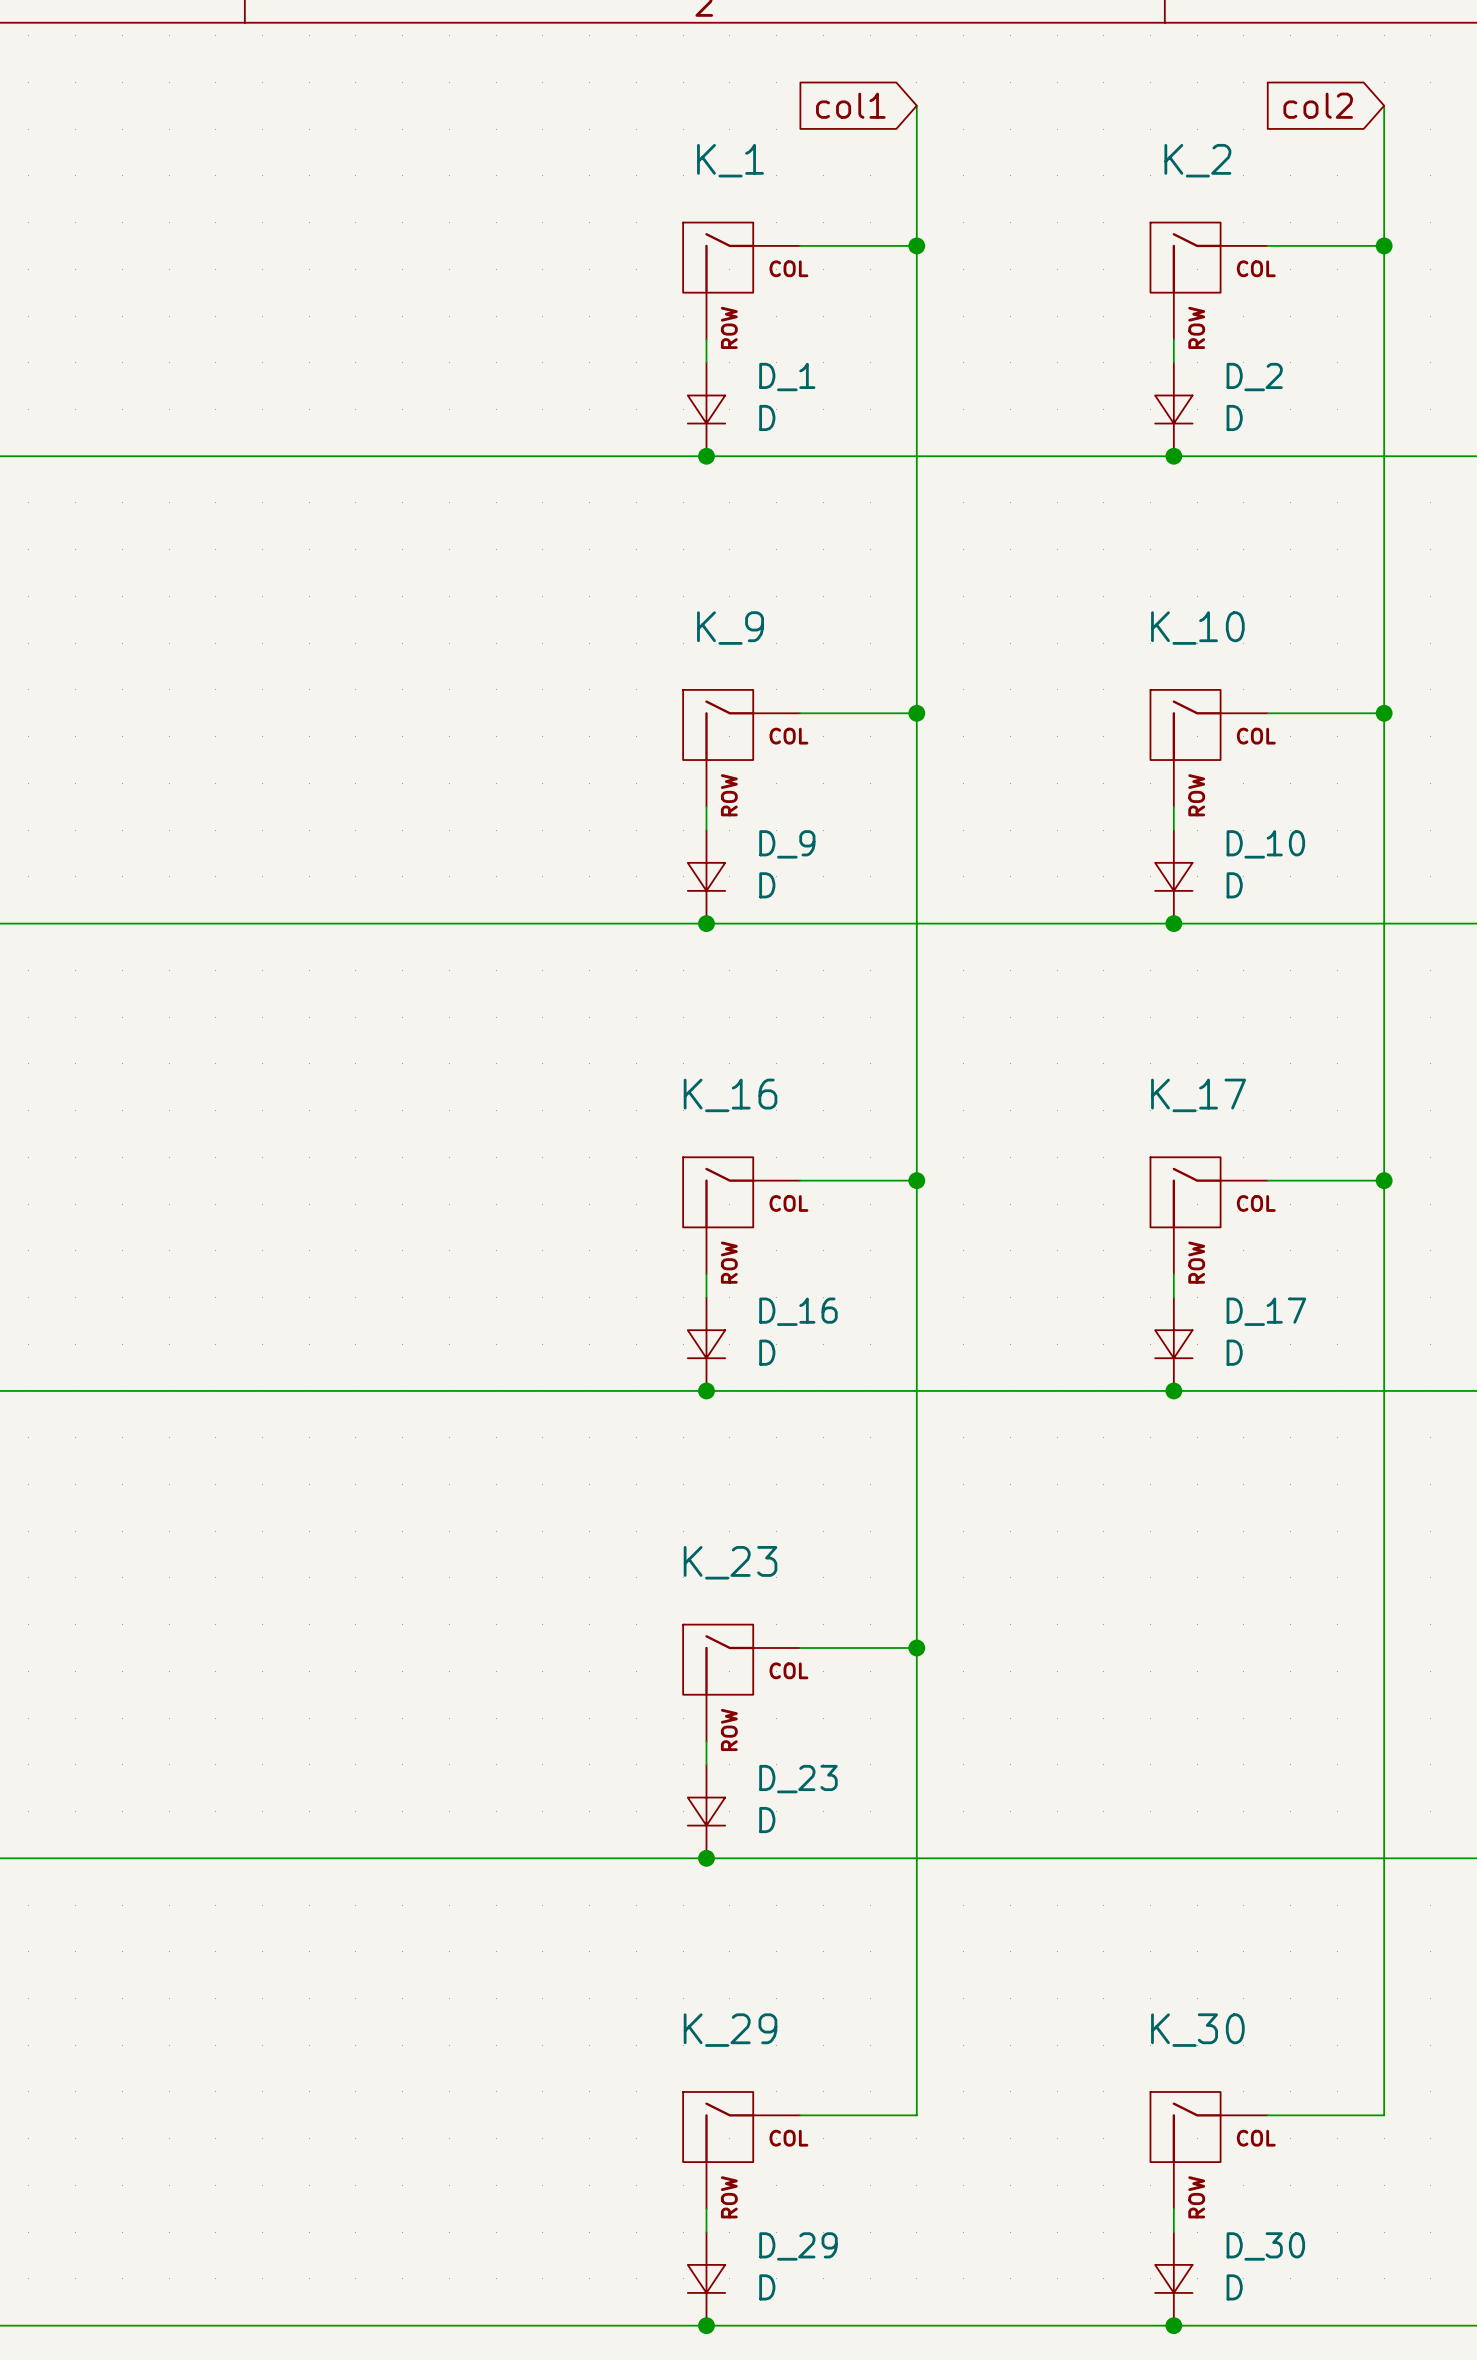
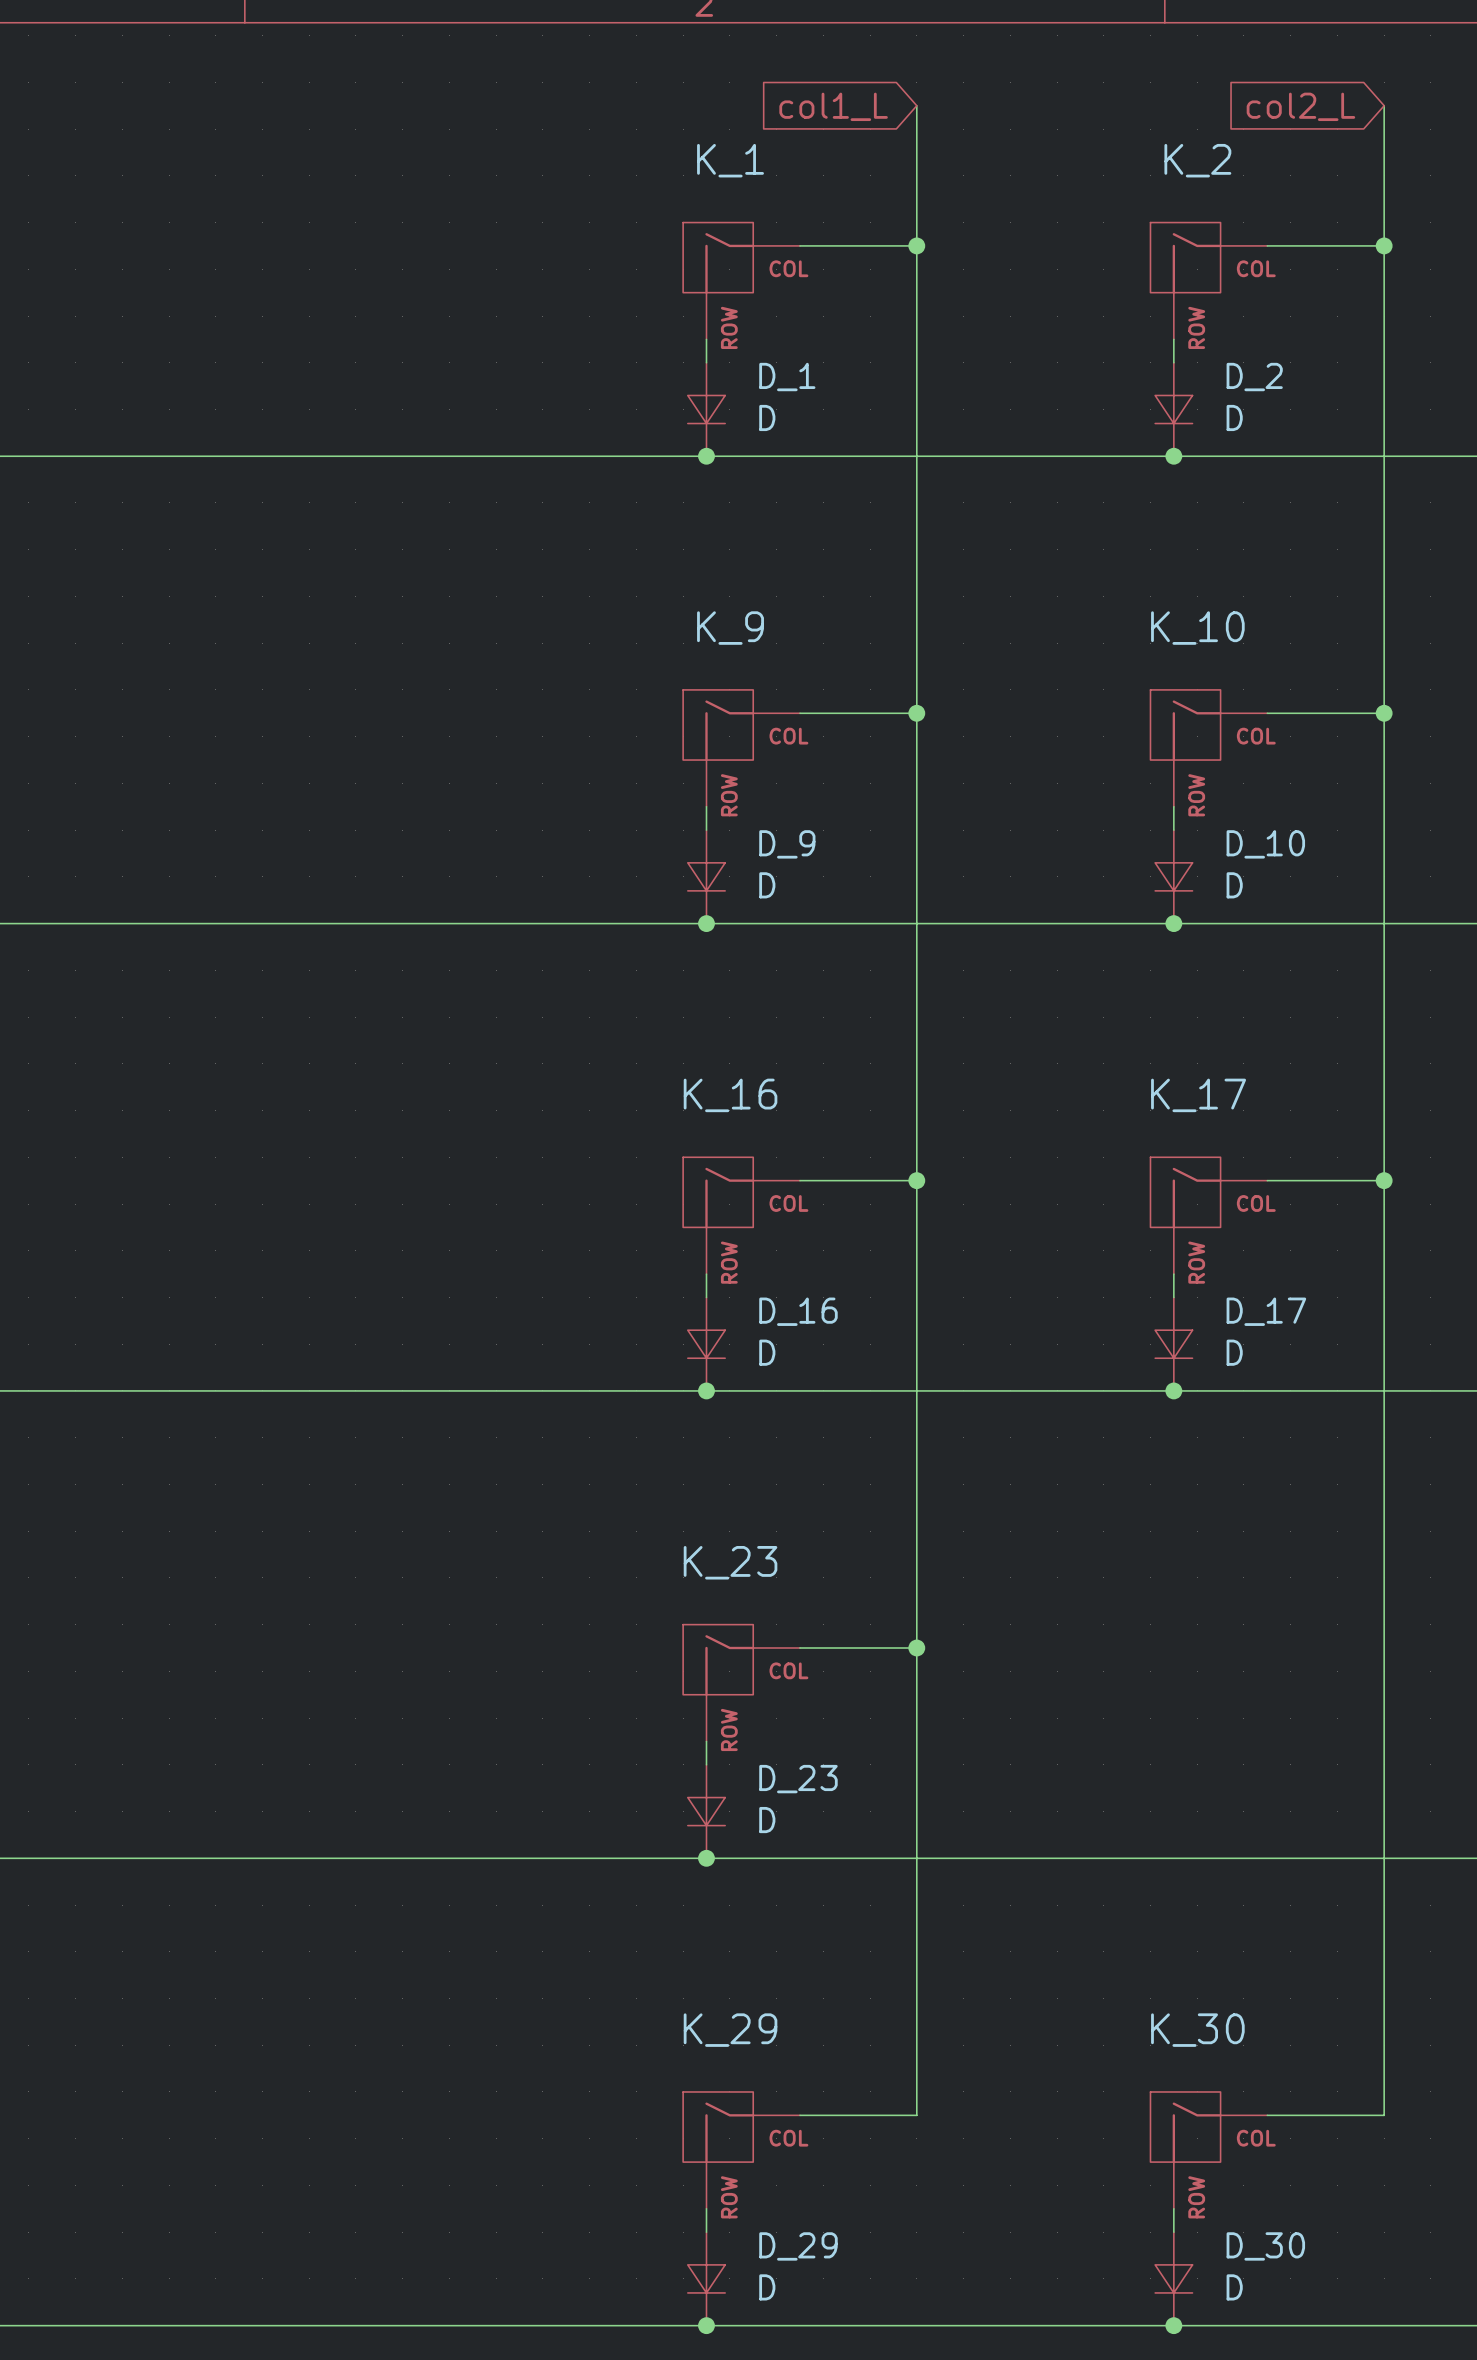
global label: col1 (850, 105) -> col1_L (833, 106)
global label: col2 (1318, 105) -> col2_L (1300, 106)

